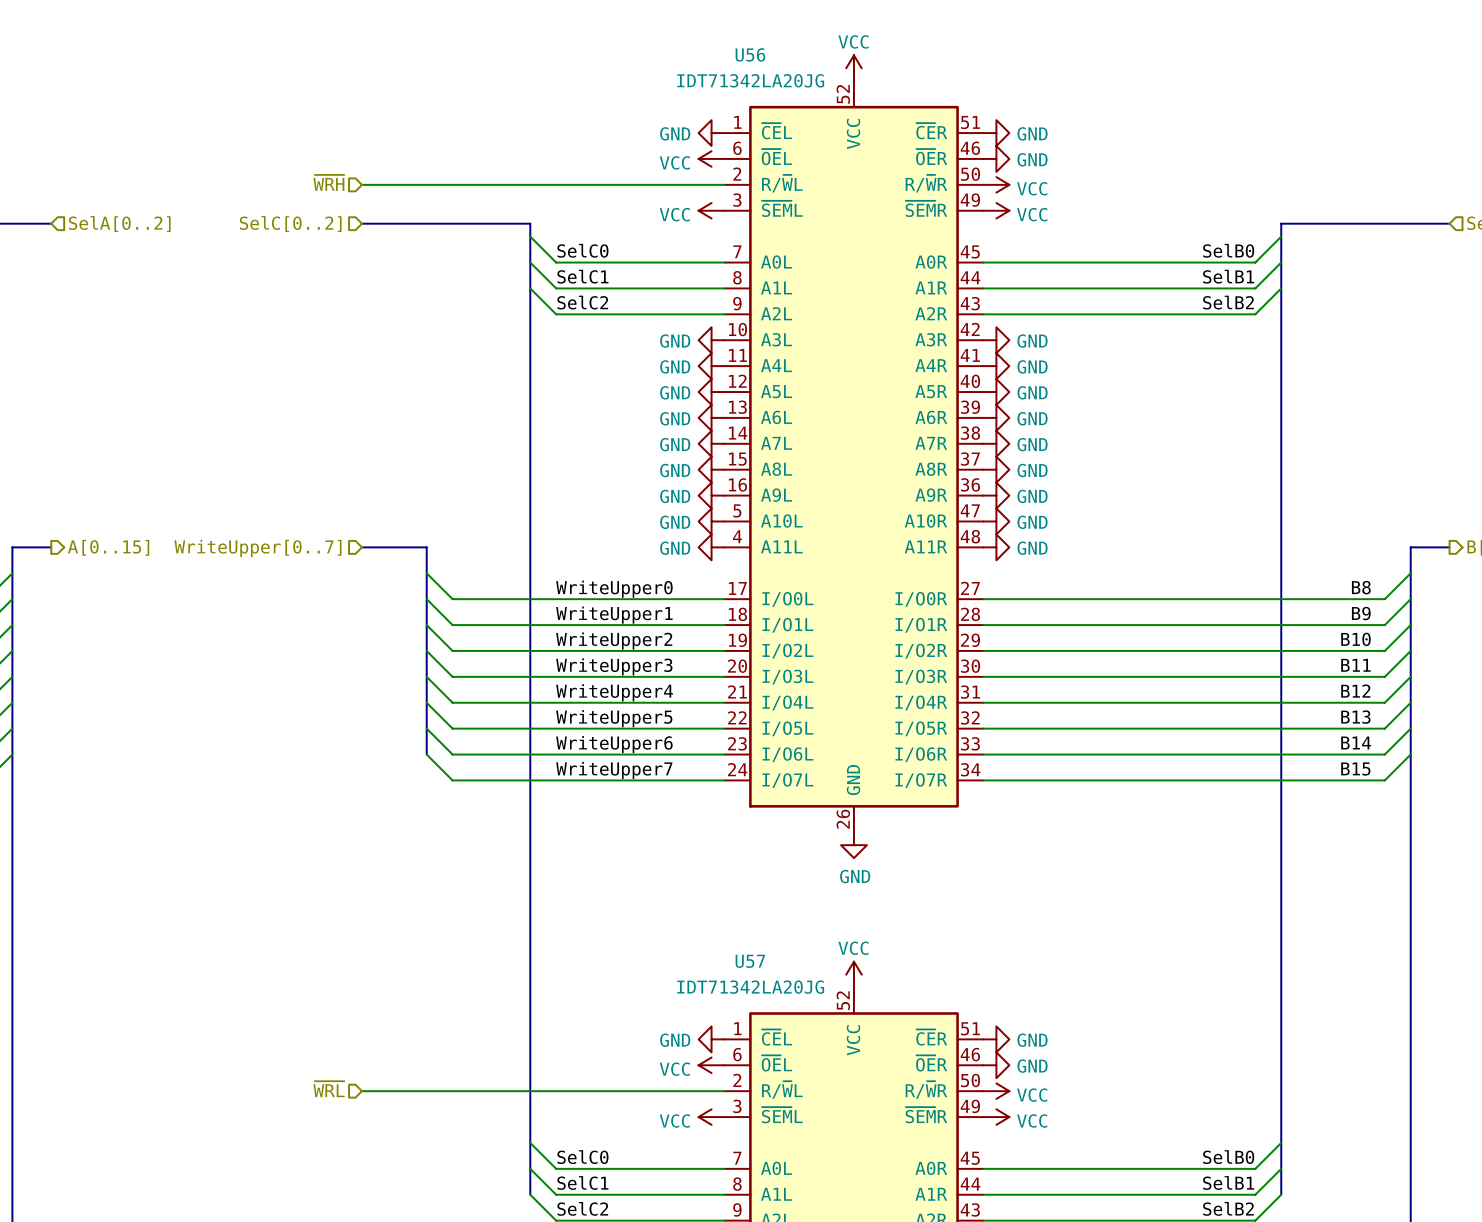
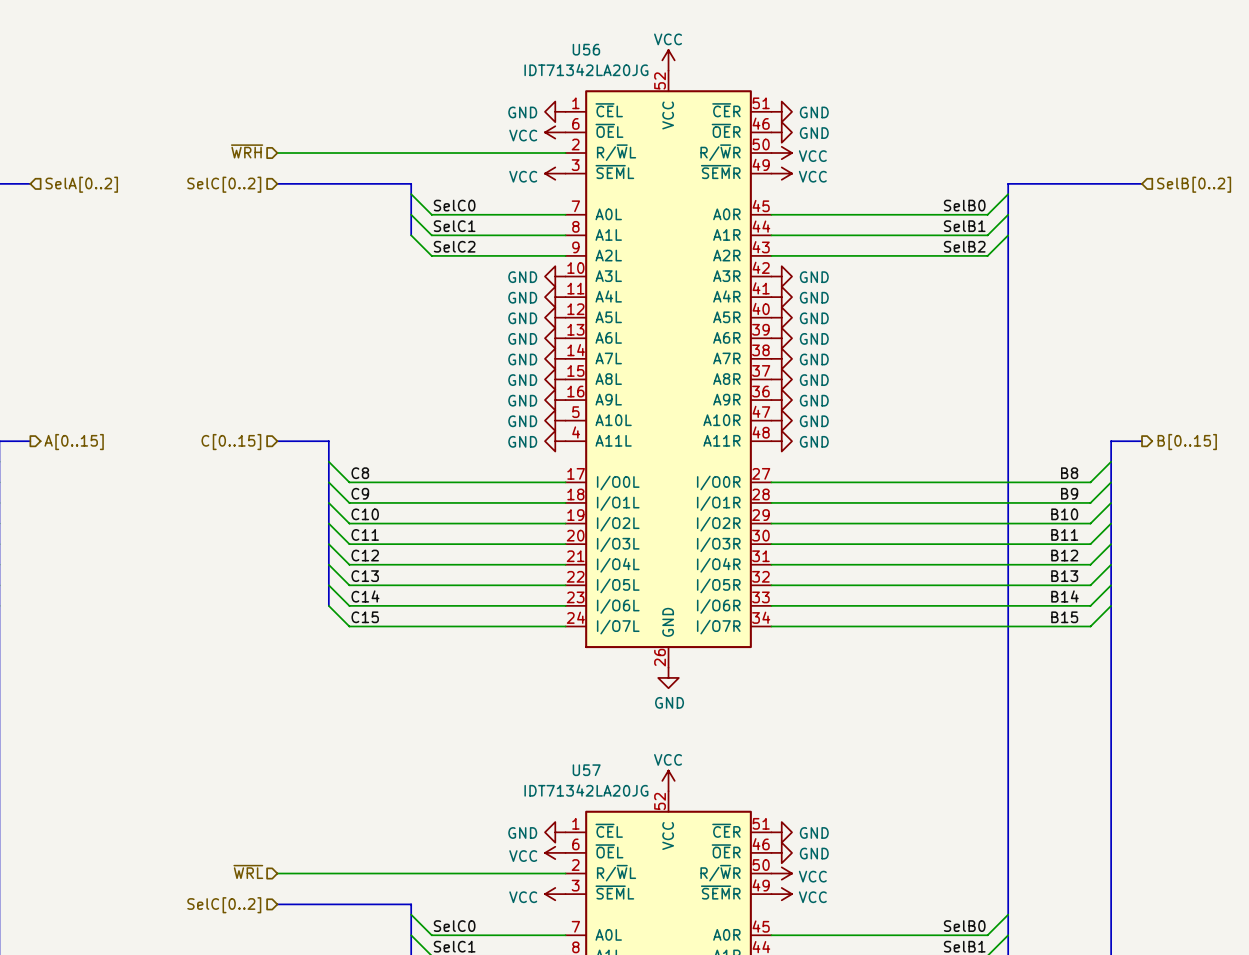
bus: (530, 288) (530, 1130) -> (277, 904) (411, 904)
hierarchical label: WriteUpper[0..7] (257, 548) -> C[0..15] (231, 442)
label: none -> C8 (360, 473)
label: WriteUpper0 (614, 589) -> none
label: none -> C9 (360, 493)
label: WriteUpper1 (614, 615) -> none
label: none -> C10 (365, 514)
label: WriteUpper2 (614, 640) -> none
label: none -> C11 (365, 534)
label: WriteUpper3 (614, 666) -> none
label: none -> C12 (365, 555)
label: WriteUpper4 (614, 692) -> none
label: none -> C13 (365, 576)
label: WriteUpper5 (614, 718) -> none
label: none -> C14 (365, 596)
label: WriteUpper6 (614, 744) -> none
label: none -> C15 (365, 617)
label: WriteUpper7 (614, 770) -> none
hierarchical label: none -> SelC[0..2] (224, 905)

